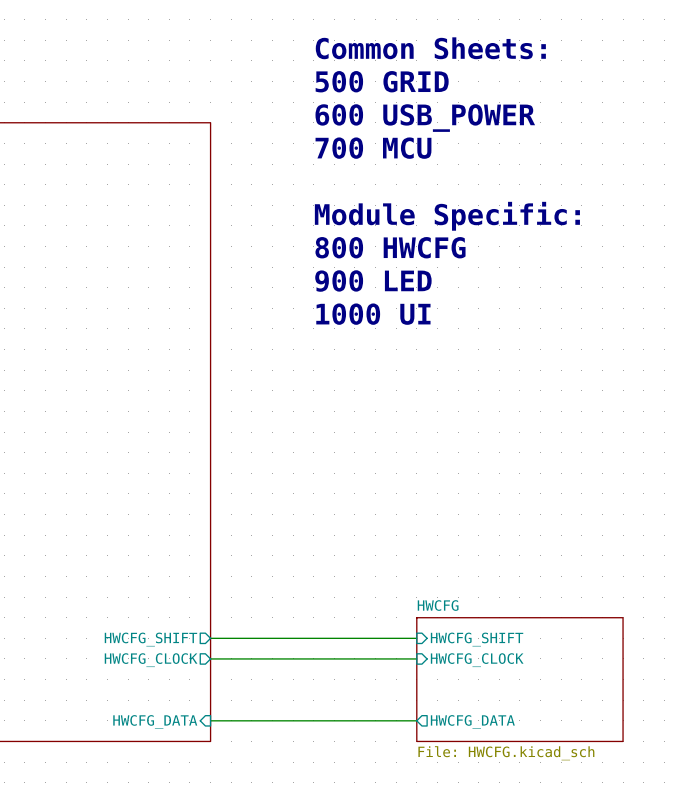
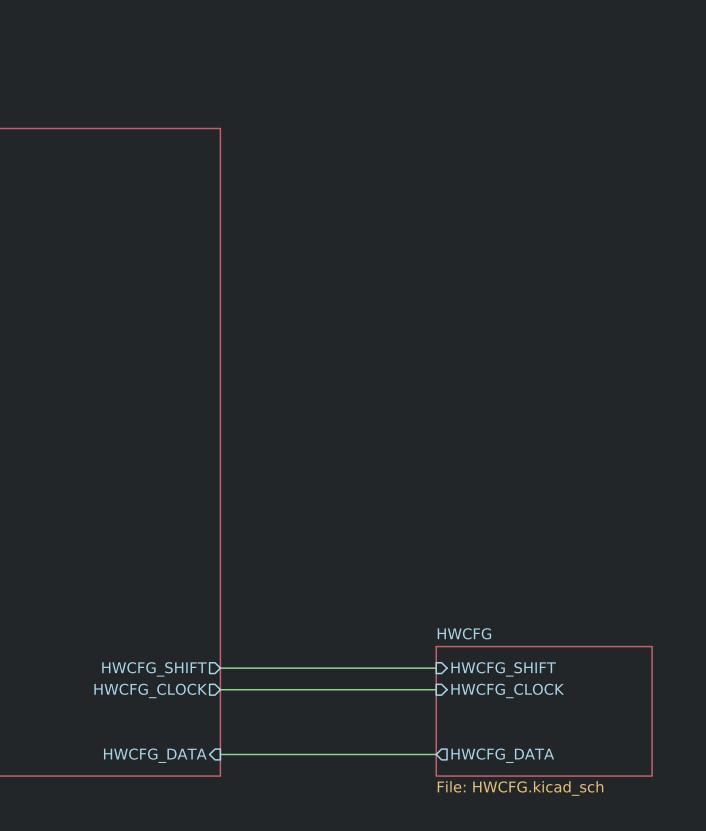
text: Common Sheets: (430, 48) -> none
text: 500 GRID (382, 81) -> none
text: 600 USB_POWER (425, 118) -> none
text: 700 MCU (373, 148) -> none
text: Module Specific: (447, 216) -> none
text: 800 HWCFG (390, 247) -> none
text: 900 LED (373, 281) -> none
text: 1000 UI (373, 314) -> none

